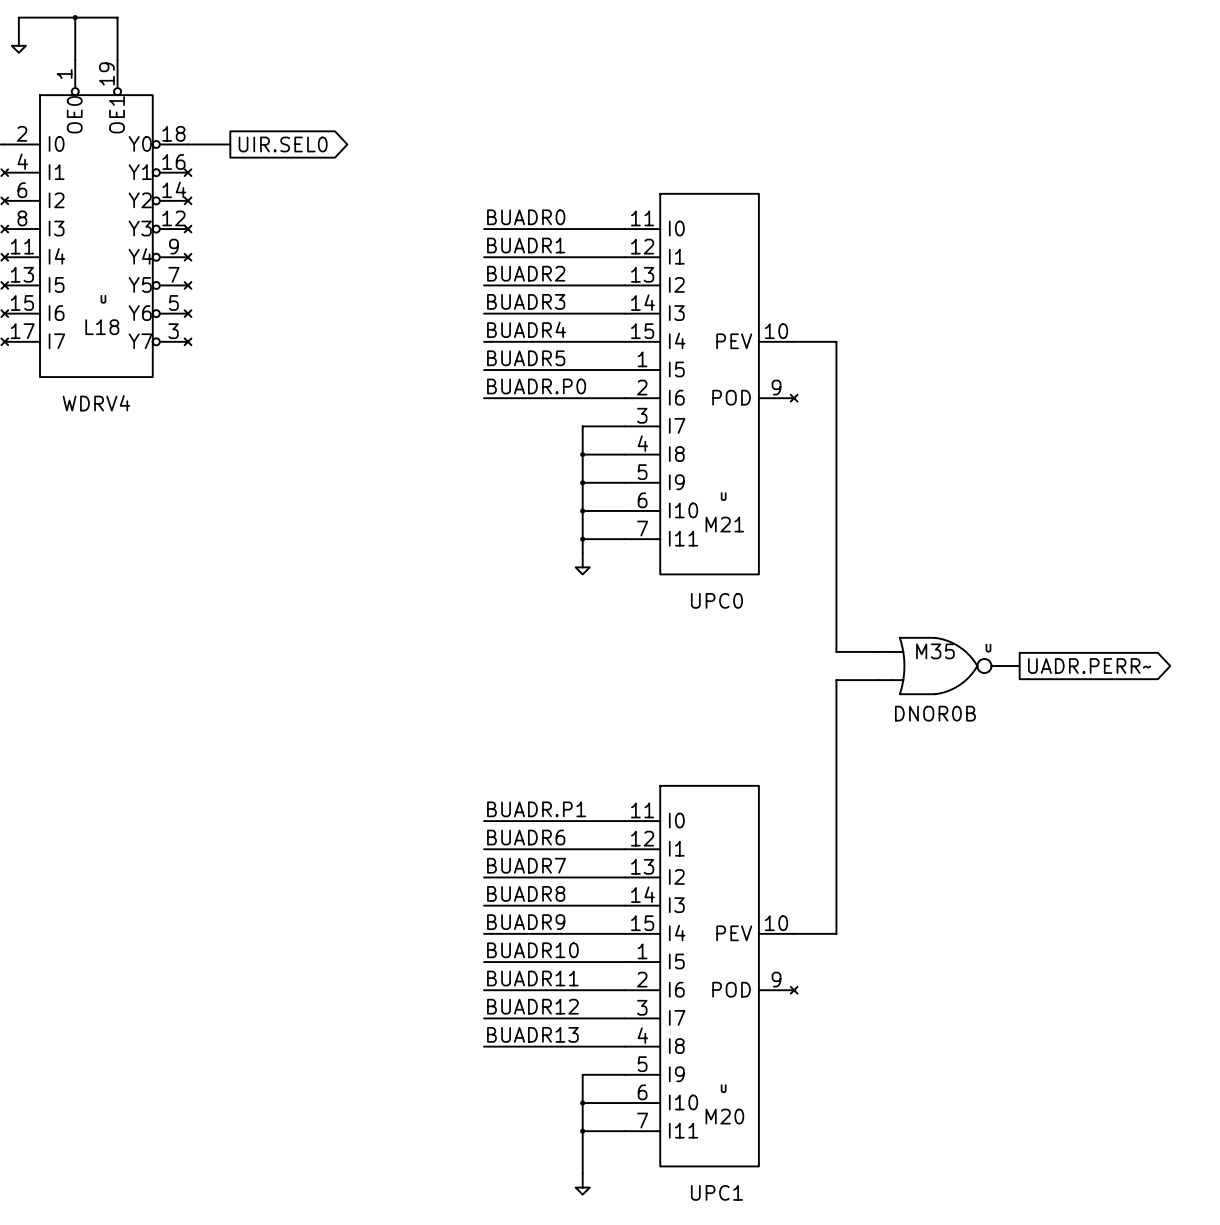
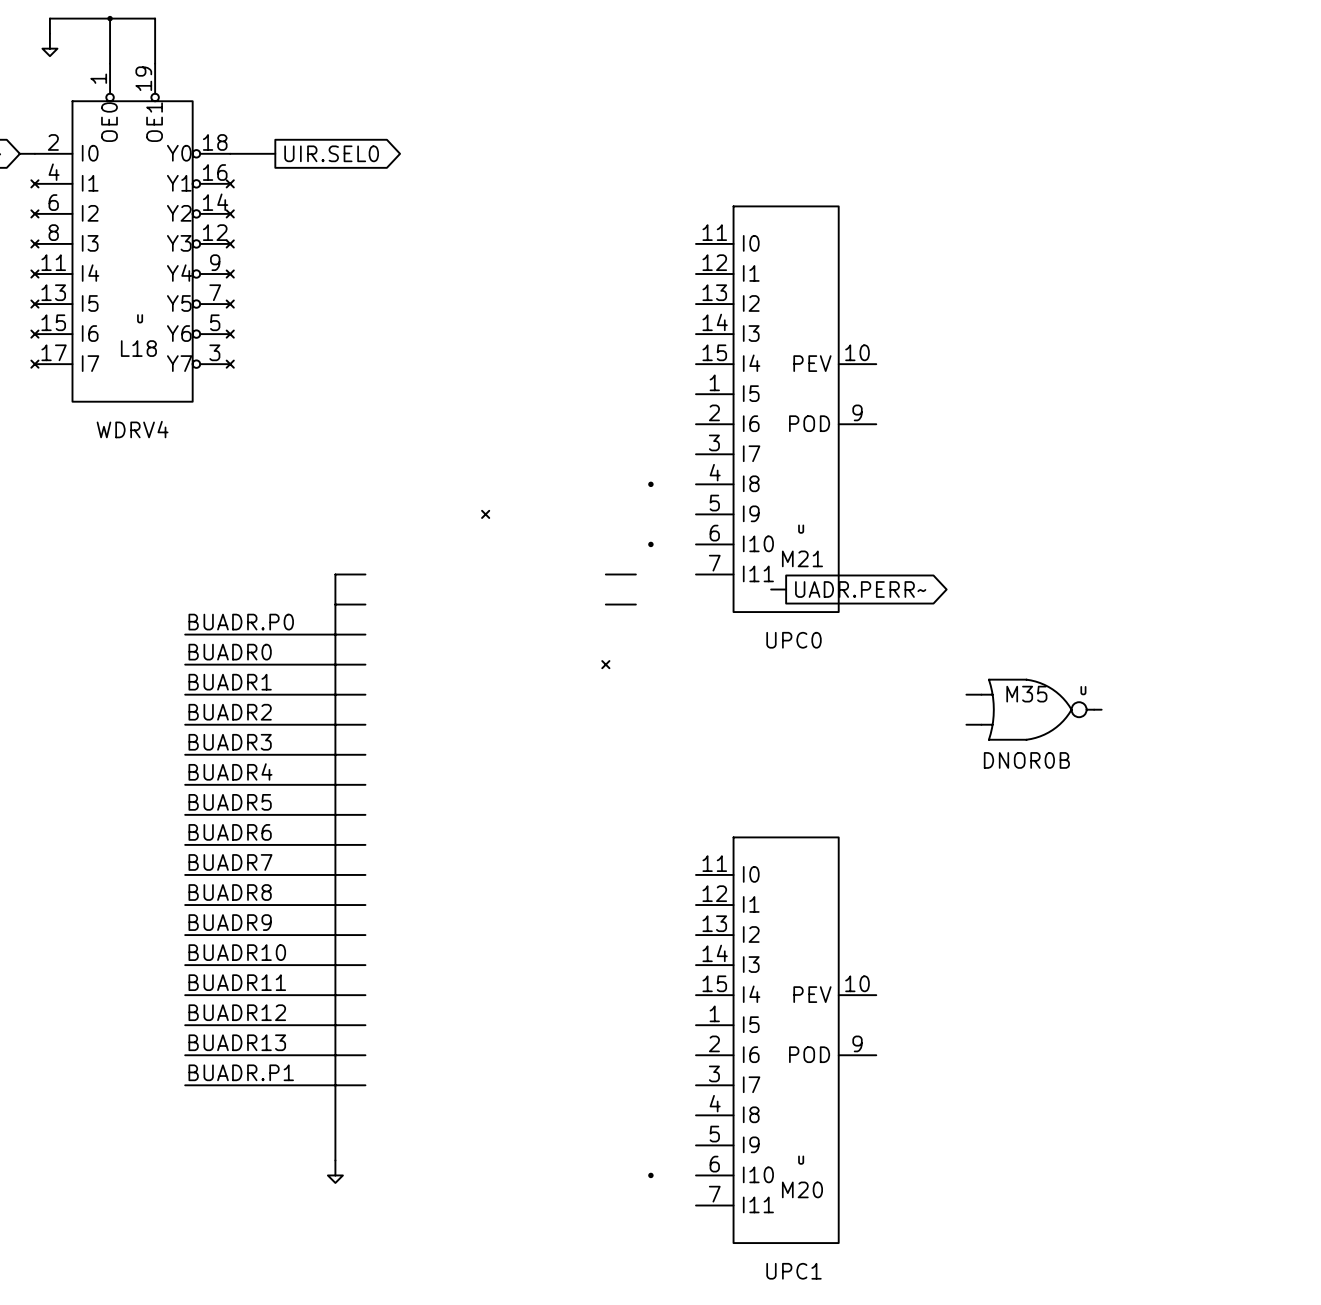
label: BUADR0 (526, 217) -> none
wire: (484, 229) (624, 229) -> none
label: BUADR1 (526, 245) -> none
wire: (484, 257) (624, 257) -> none
label: BUADR2 (526, 273) -> none
wire: (484, 285) (624, 285) -> none
label: BUADR3 (526, 301) -> none
wire: (484, 313) (624, 313) -> none
label: BUADR4 (526, 329) -> none
wire: (484, 341) (624, 341) -> none
wire: (794, 341) (836, 341) (836, 651) (878, 651) -> none
label: BUADR5 (526, 358) -> none
wire: (484, 370) (624, 370) -> none
label: BUADR.P0 (536, 386) -> none
wire: (484, 398) (624, 398) -> none
no-connect mark: (794, 398) -> none
wire: (624, 426) (582, 426) (582, 553) -> none
wire: (582, 454) (624, 454) -> none
no-connect mark: none -> (485, 514)
wire: (582, 482) (624, 482) -> none
junction: (582, 482) -> none
wire: (582, 510) (624, 510) -> none
wire: none -> (365, 574) (335, 574) (335, 1160)
wire: none -> (605, 574) (635, 574)
wire: (582, 539) (624, 539) -> none
junction: (582, 539) -> none
wire: none -> (771, 589) (786, 589)
global label: none -> UADR.PERR~ (860, 589)
power symbol: (582, 564) -> none
wire: none -> (335, 604) (365, 604)
wire: none -> (605, 604) (635, 604)
label: none -> BUADR.P0 (241, 622)
wire: none -> (185, 634) (365, 634)
label: none -> BUADR0 (230, 652)
wire: none -> (185, 664) (365, 664)
no-connect mark: none -> (605, 664)
label: none -> BUADR1 (230, 682)
wire: none -> (185, 694) (365, 694)
wire: (1005, 666) (1019, 666) -> none
global label: UADR.PERR~ (1089, 666) -> none
label: none -> BUADR2 (230, 712)
wire: none -> (185, 724) (365, 724)
wire: (878, 680) (836, 680) (836, 933) (794, 933) -> none
label: none -> BUADR3 (230, 742)
wire: none -> (185, 754) (365, 754)
label: none -> BUADR4 (230, 771)
wire: none -> (185, 784) (365, 784)
label: none -> BUADR5 (230, 802)
wire: none -> (185, 814) (365, 814)
label: none -> BUADR6 (230, 832)
wire: none -> (185, 844) (365, 844)
label: none -> BUADR7 (230, 862)
label: BUADR.P1 (536, 809) -> none
wire: none -> (185, 874) (365, 874)
wire: (484, 821) (624, 821) -> none
label: none -> BUADR8 (230, 892)
label: BUADR6 (526, 837) -> none
wire: none -> (185, 905) (365, 905)
wire: (484, 849) (624, 849) -> none
label: none -> BUADR9 (230, 922)
label: BUADR7 (526, 865) -> none
wire: none -> (185, 935) (365, 935)
wire: (484, 877) (624, 877) -> none
label: none -> BUADR10 (237, 952)
label: BUADR8 (526, 893) -> none
wire: none -> (185, 965) (365, 965)
wire: (484, 905) (624, 905) -> none
label: none -> BUADR11 (237, 982)
label: BUADR9 (526, 922) -> none
wire: none -> (185, 995) (365, 995)
wire: (484, 933) (624, 933) -> none
label: none -> BUADR12 (237, 1012)
label: BUADR10 (532, 950) -> none
wire: none -> (185, 1025) (365, 1025)
wire: (484, 962) (624, 962) -> none
label: none -> BUADR13 (237, 1042)
label: BUADR11 (532, 978) -> none
wire: none -> (185, 1055) (365, 1055)
wire: (484, 990) (624, 990) -> none
no-connect mark: (794, 990) -> none
label: none -> BUADR.P1 (241, 1072)
label: BUADR12 (532, 1006) -> none
wire: none -> (185, 1085) (365, 1085)
wire: (484, 1018) (624, 1018) -> none
label: BUADR13 (532, 1034) -> none
wire: (484, 1046) (624, 1046) -> none
wire: (624, 1074) (582, 1074) (582, 1173) -> none
power symbol: none -> (335, 1171)
wire: (582, 1103) (624, 1103) -> none
wire: (582, 1131) (624, 1131) -> none
junction: (582, 1131) -> none
power symbol: (582, 1184) -> none

